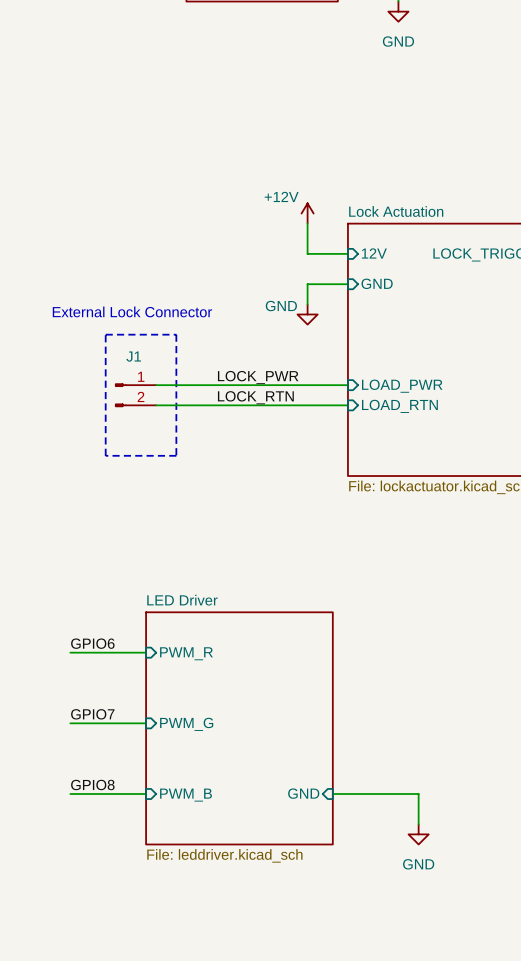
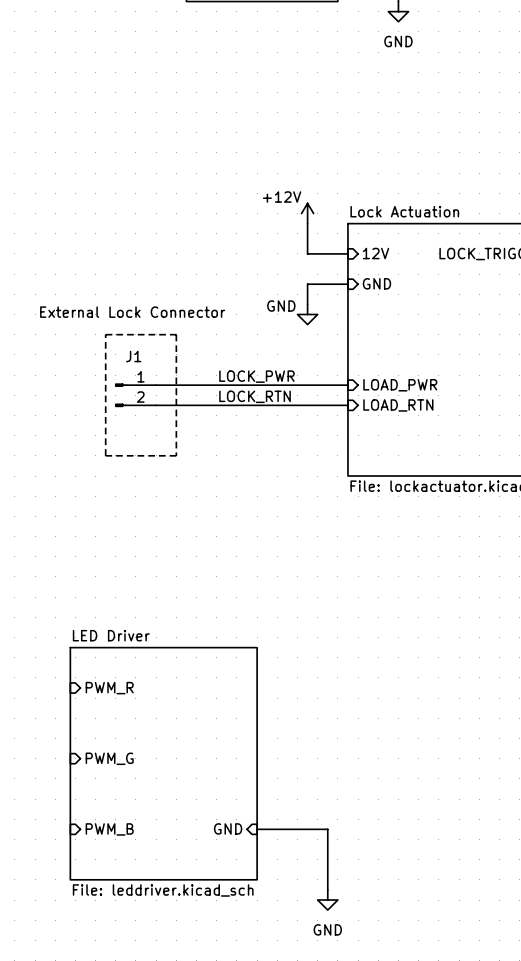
label: GPIO6 (92, 643) -> none
wire: (70, 652) (146, 652) -> none
sheet pin position: PWM_R (186, 653) -> PWM_R (109, 688)
label: GPIO7 (92, 714) -> none
wire: (70, 723) (146, 723) -> none
sheet pin position: PWM_G (186, 724) -> PWM_G (109, 758)
sheet LED Driver position: (239, 728) -> (163, 763)
label: GPIO8 (92, 784) -> none
sheet pin position: GND (303, 793) -> GND (228, 828)
wire: (70, 794) (146, 794) -> none
wire: (332, 794) (418, 794) (418, 824) -> none
sheet pin position: PWM_B (186, 795) -> PWM_B (109, 829)
wire: none -> (257, 829) (327, 829) (327, 889)
power symbol position: GND (418, 834) -> GND (327, 900)

